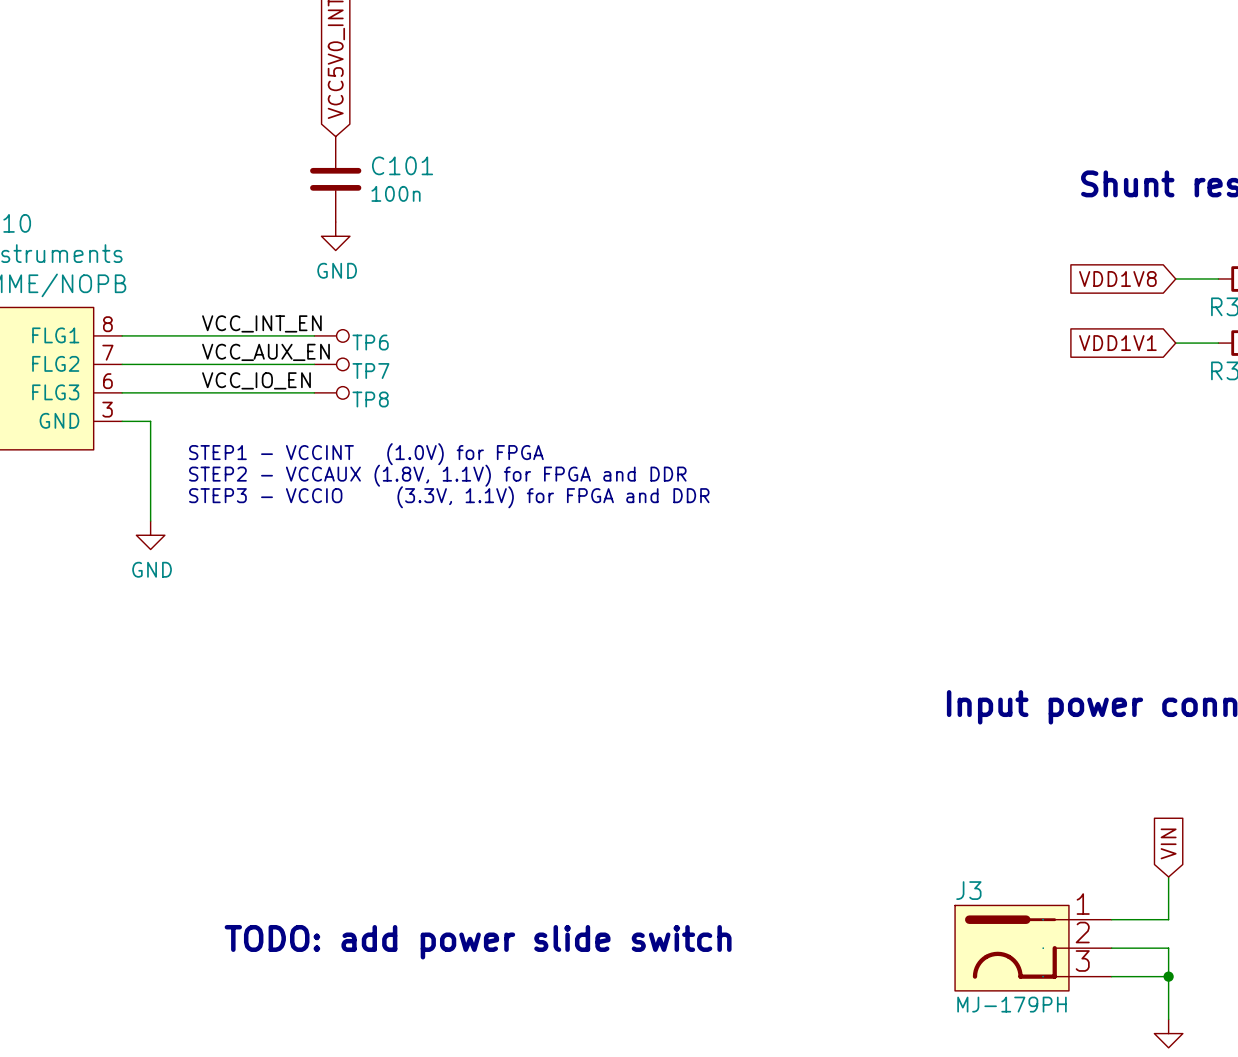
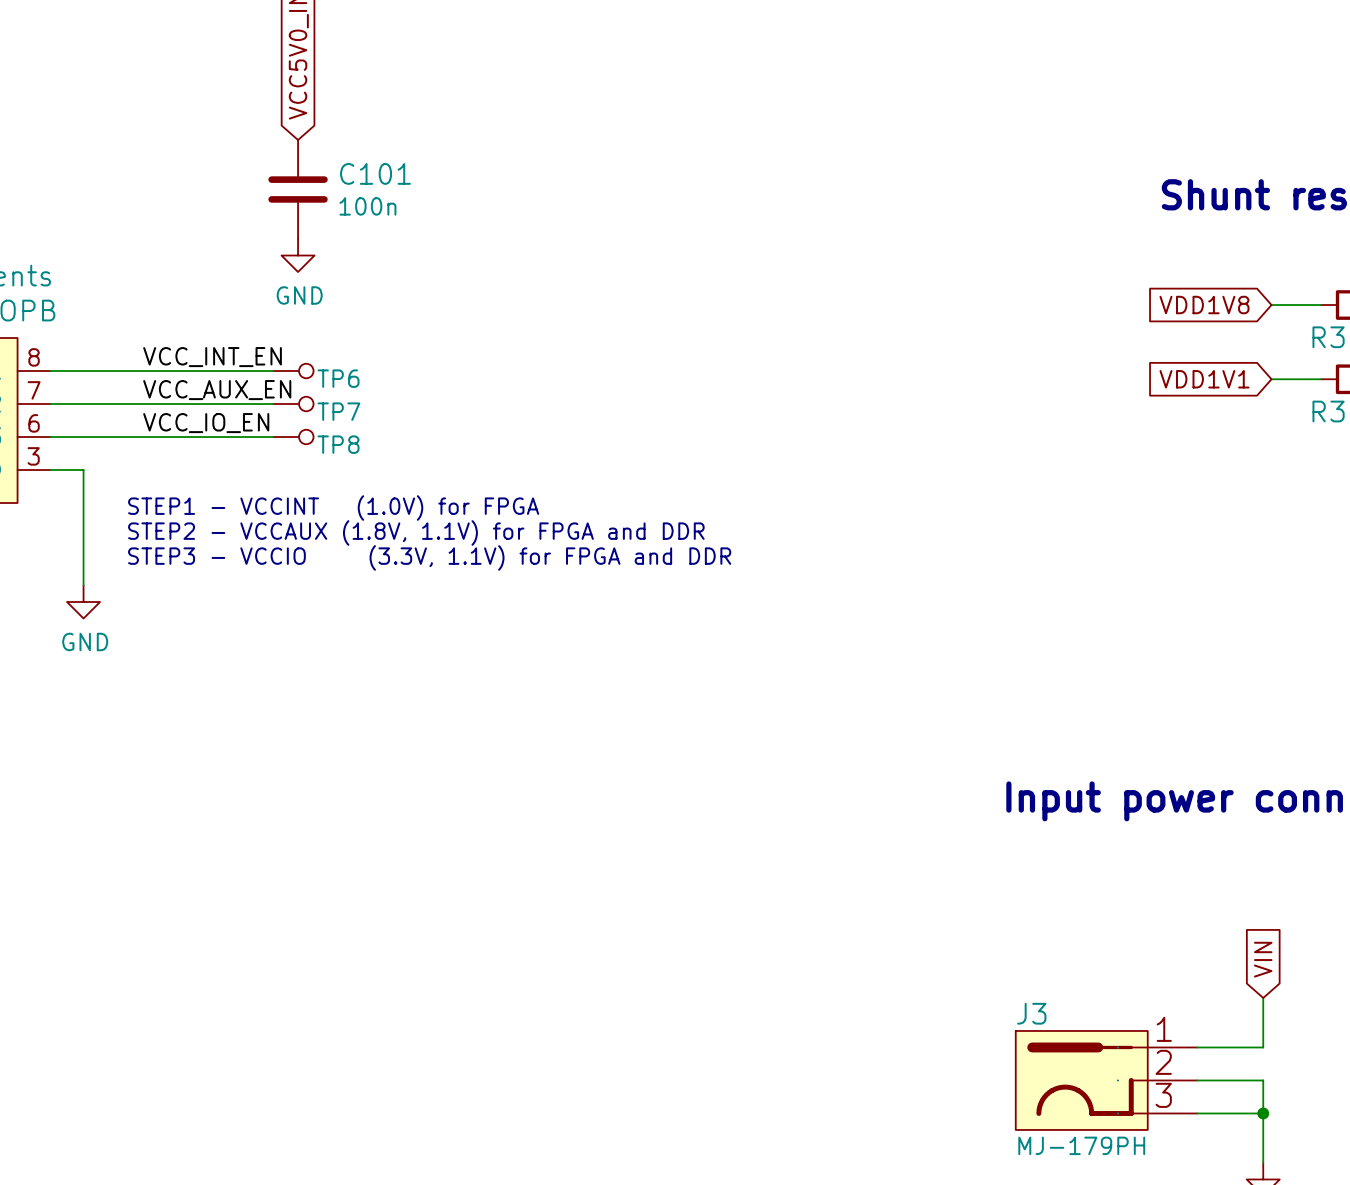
text: TODO: add power slide switch (478, 942) -> none

